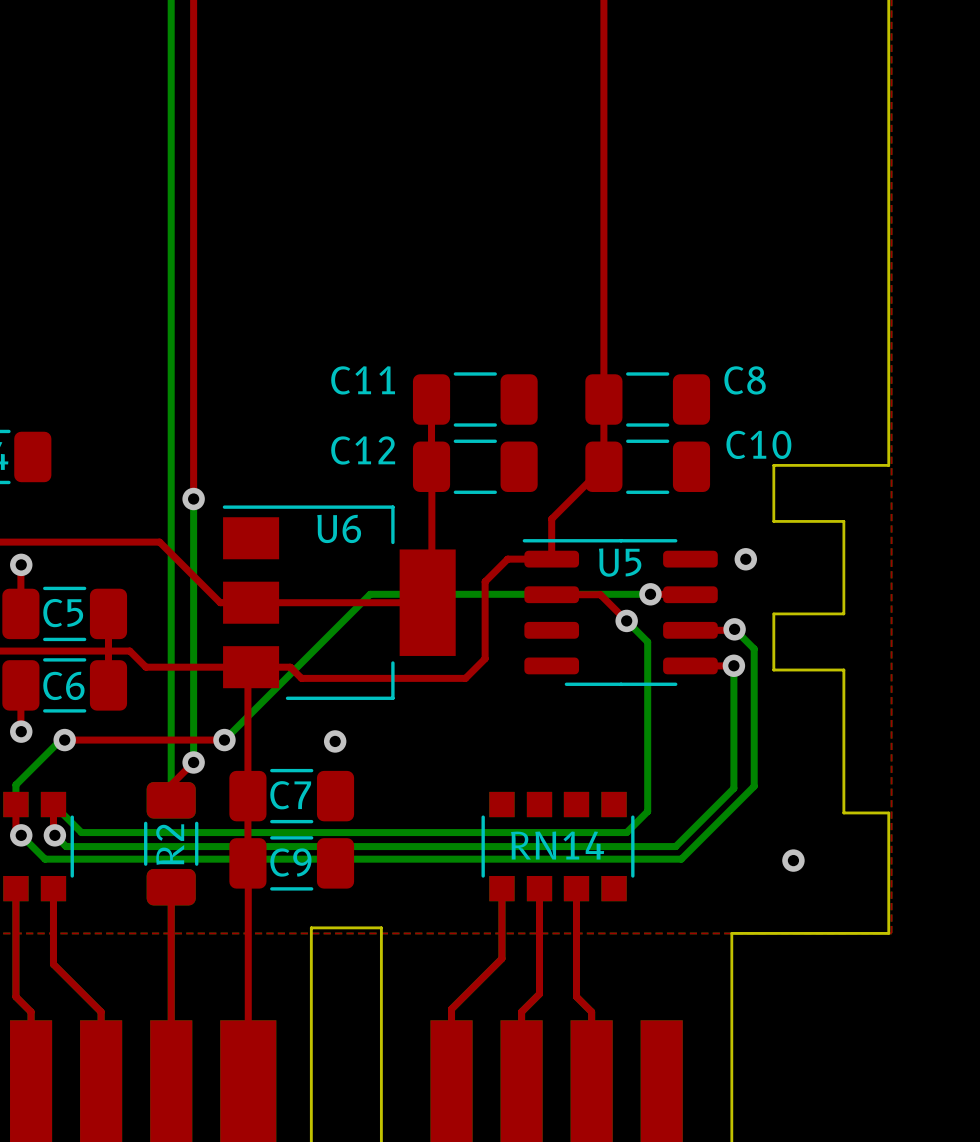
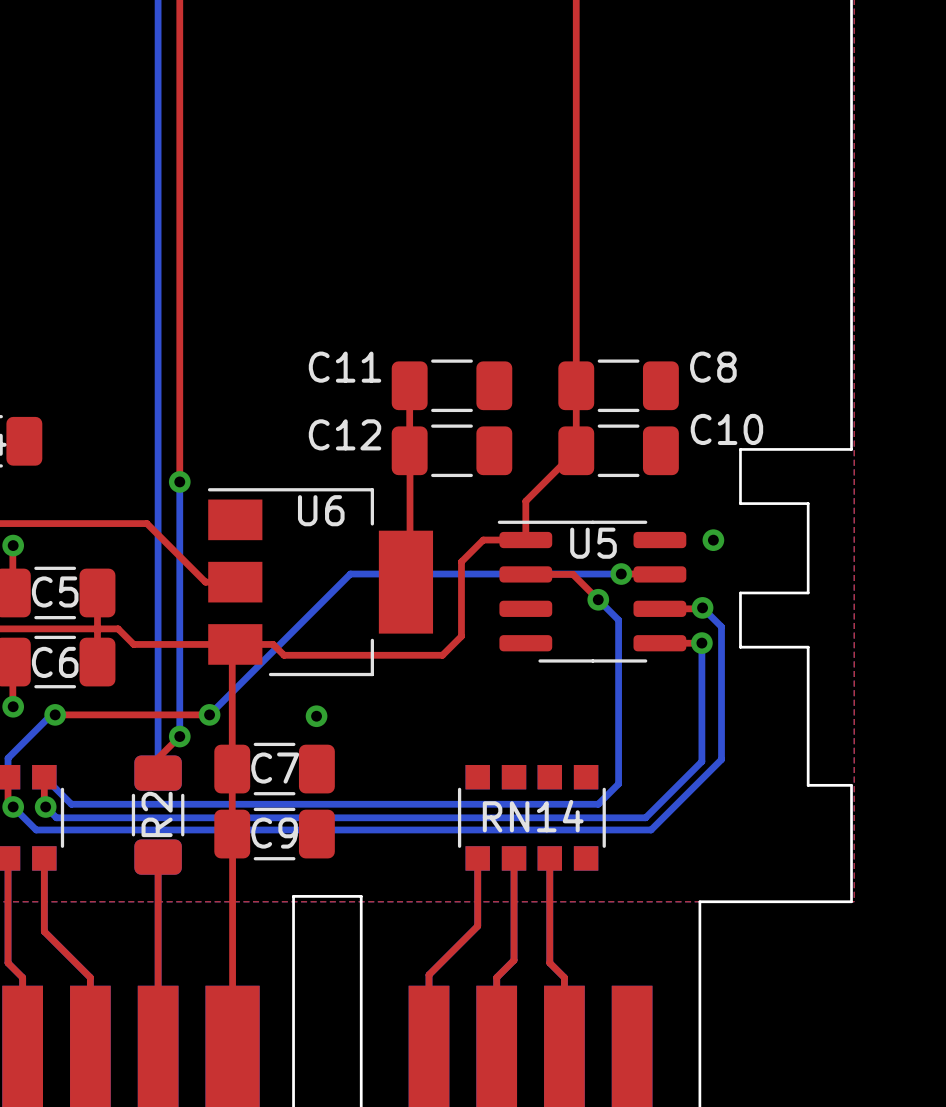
top track: (251, 602) (427, 602) -> none
via: (793, 860) -> none

